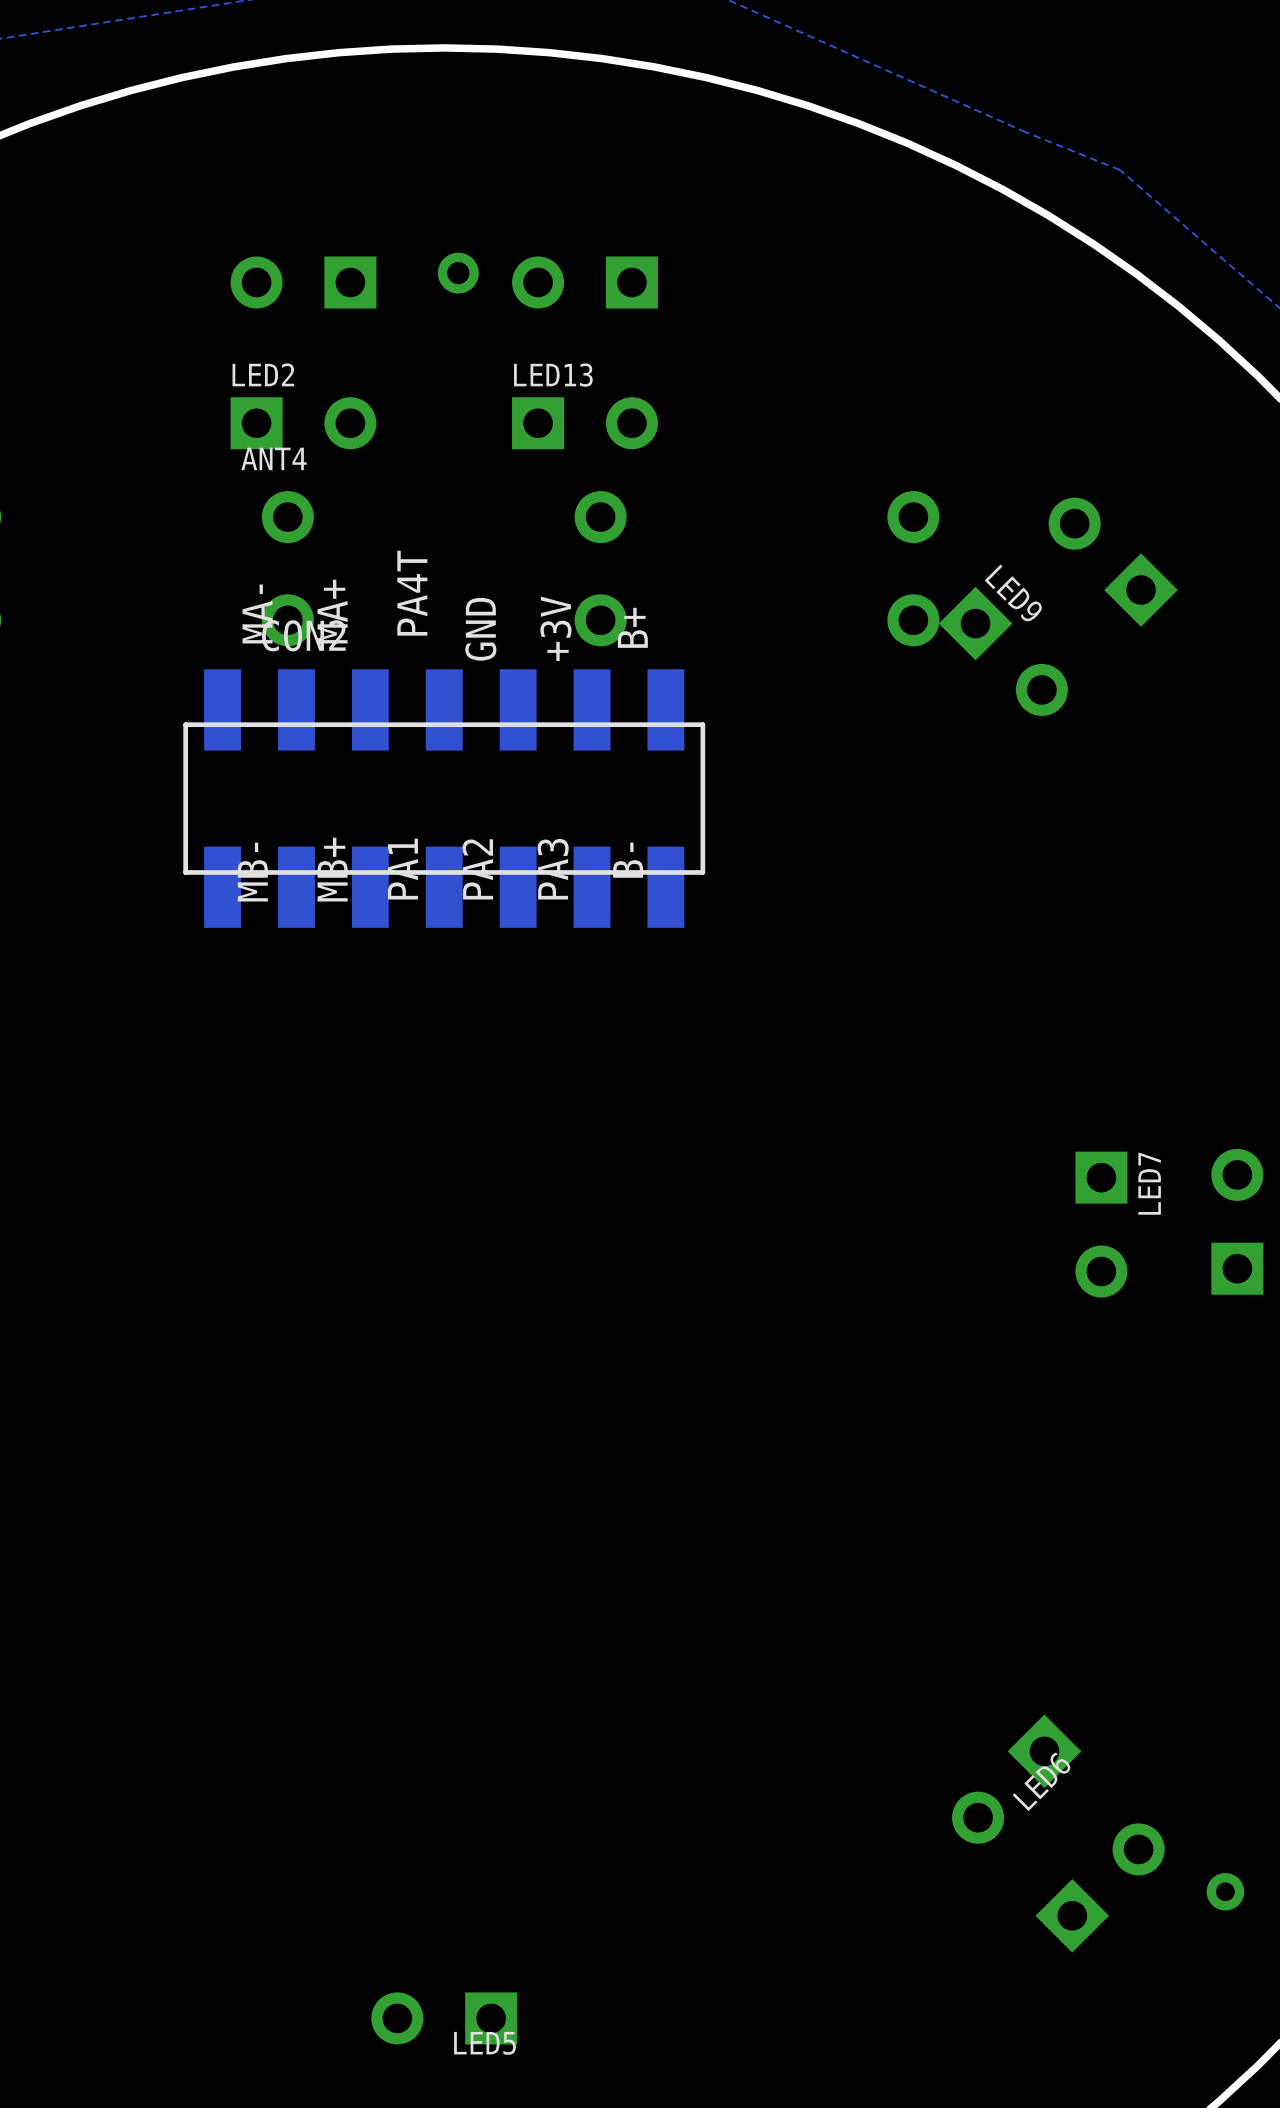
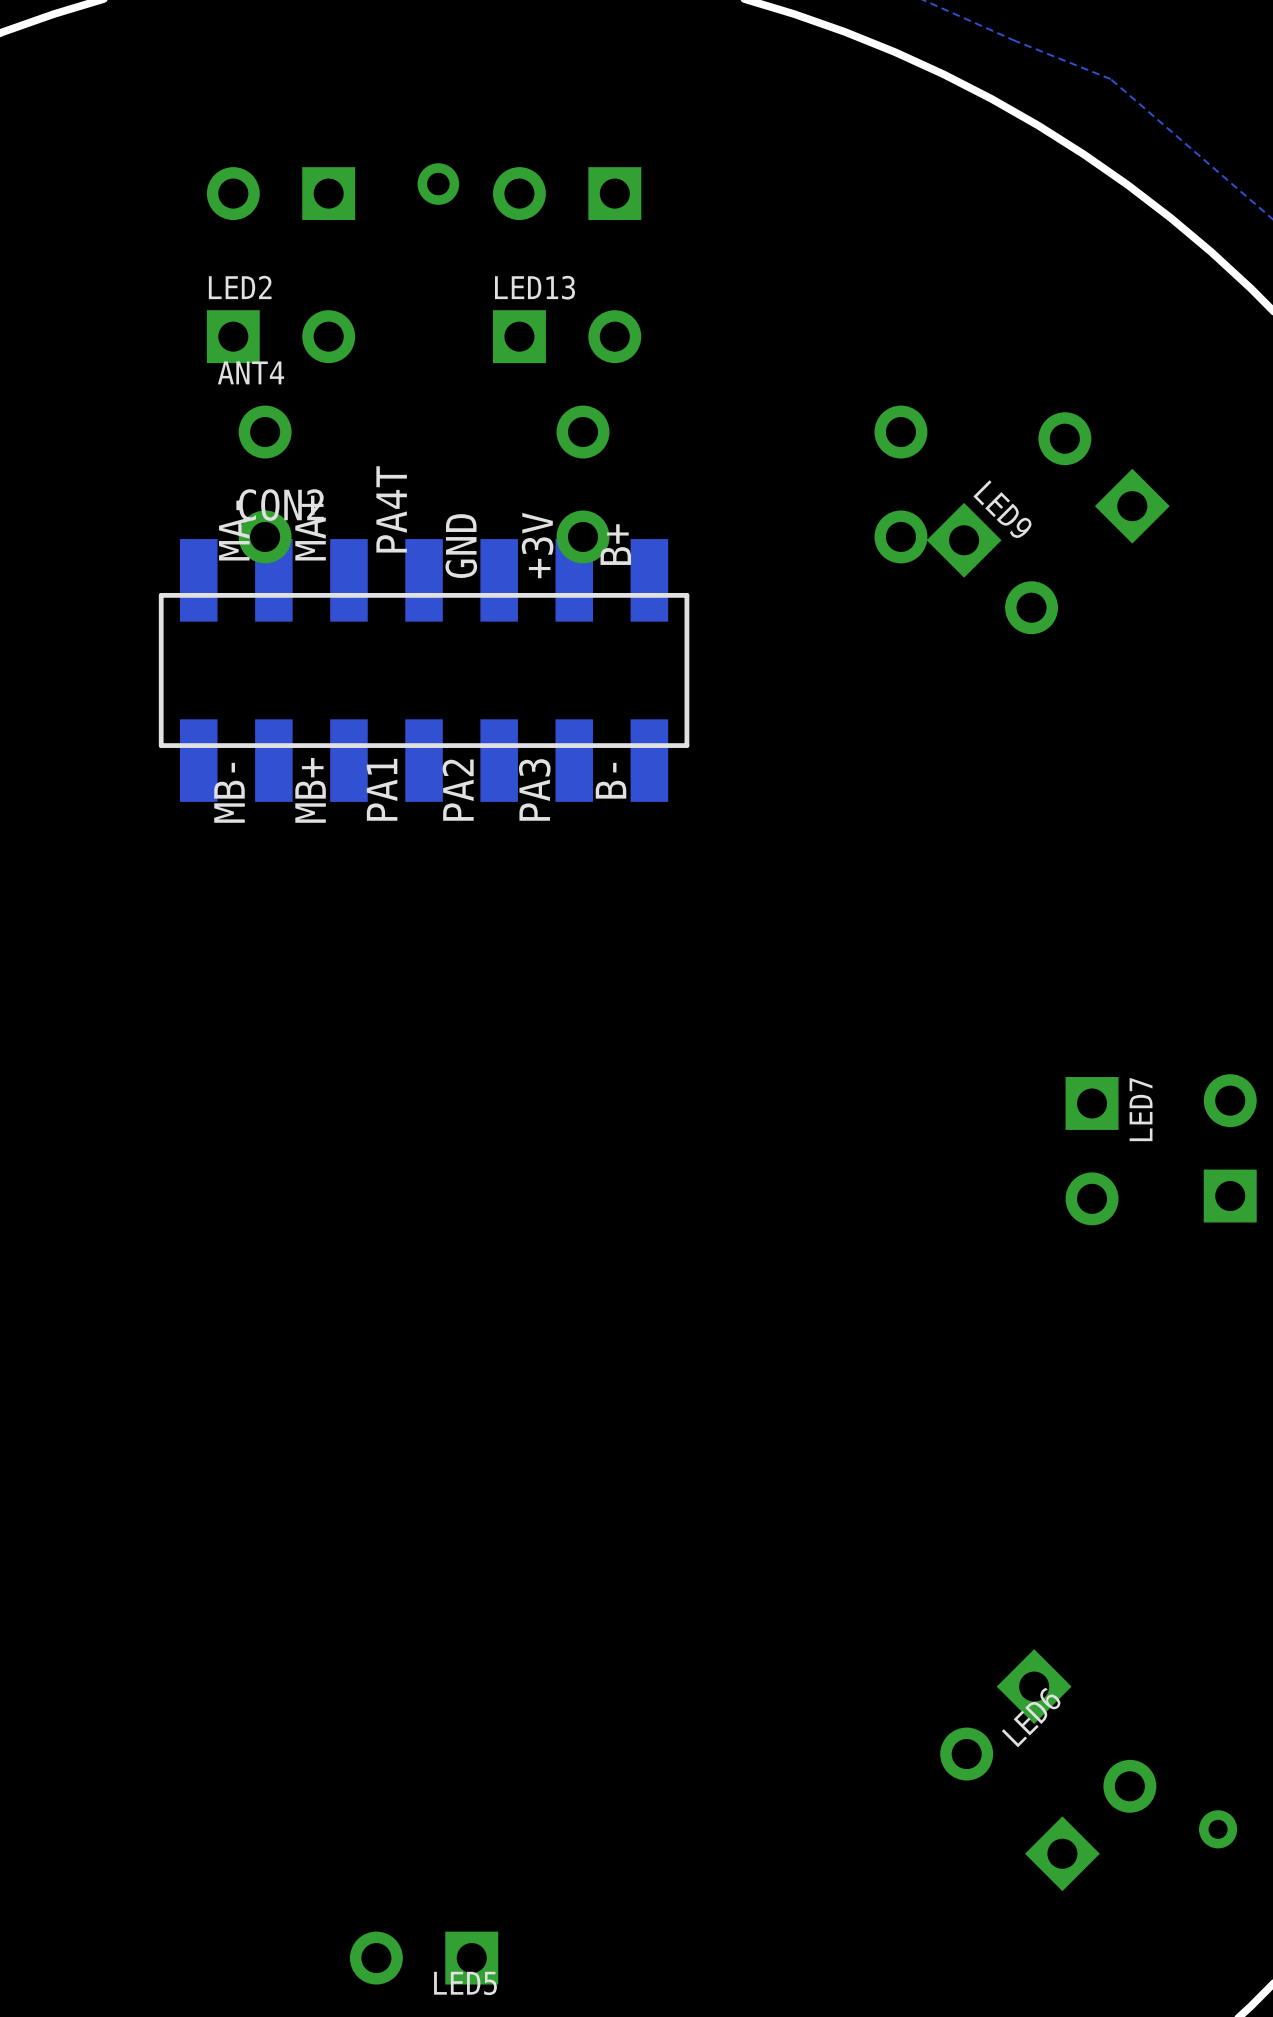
CON2 position: (444, 798) -> (424, 670)

